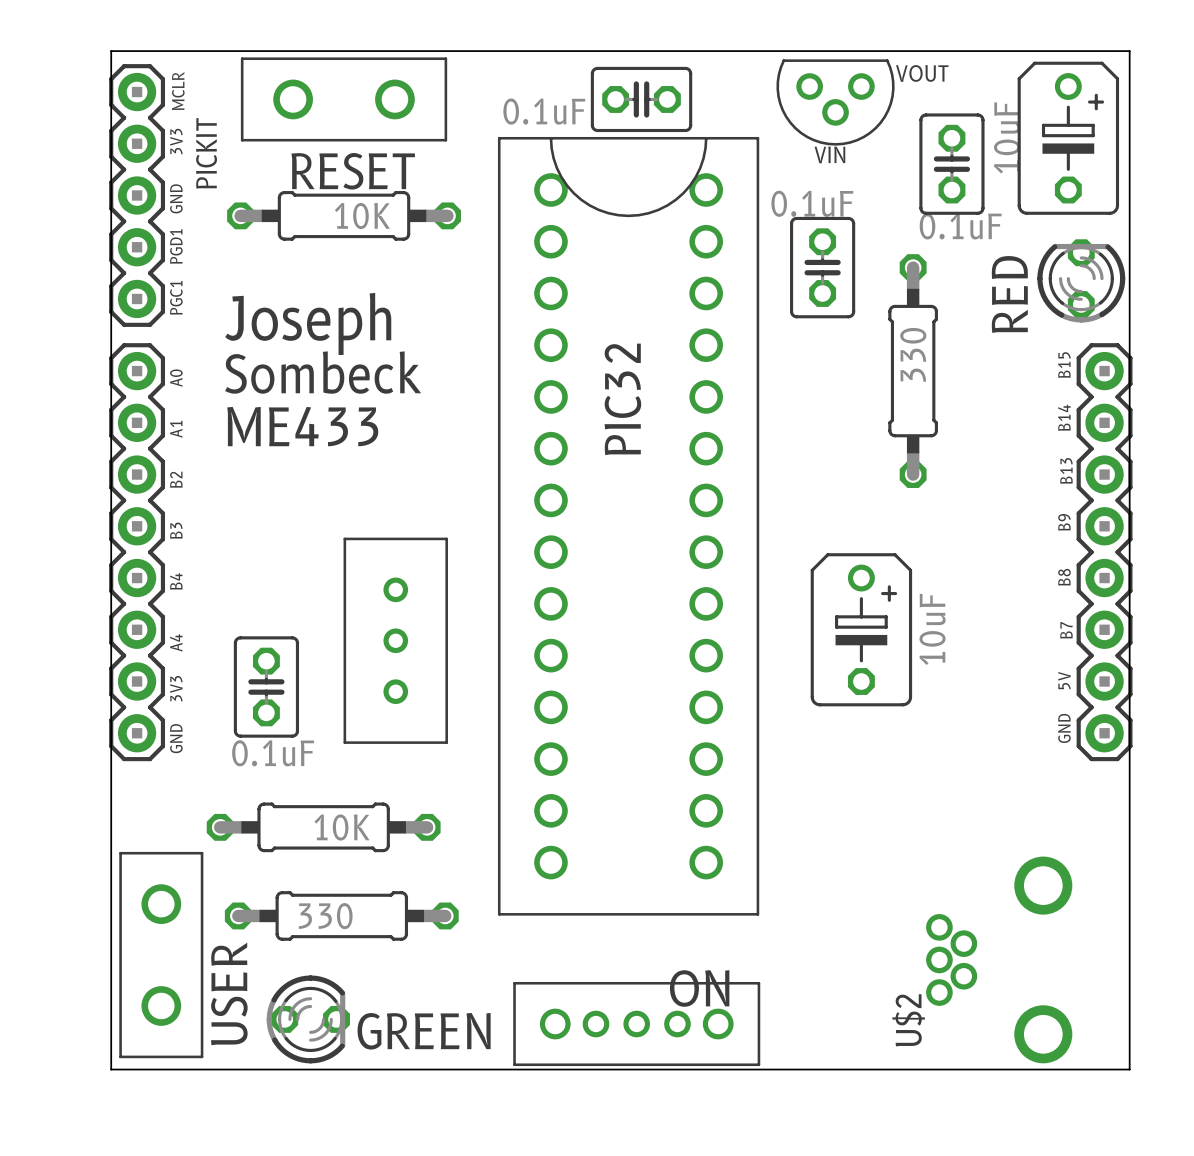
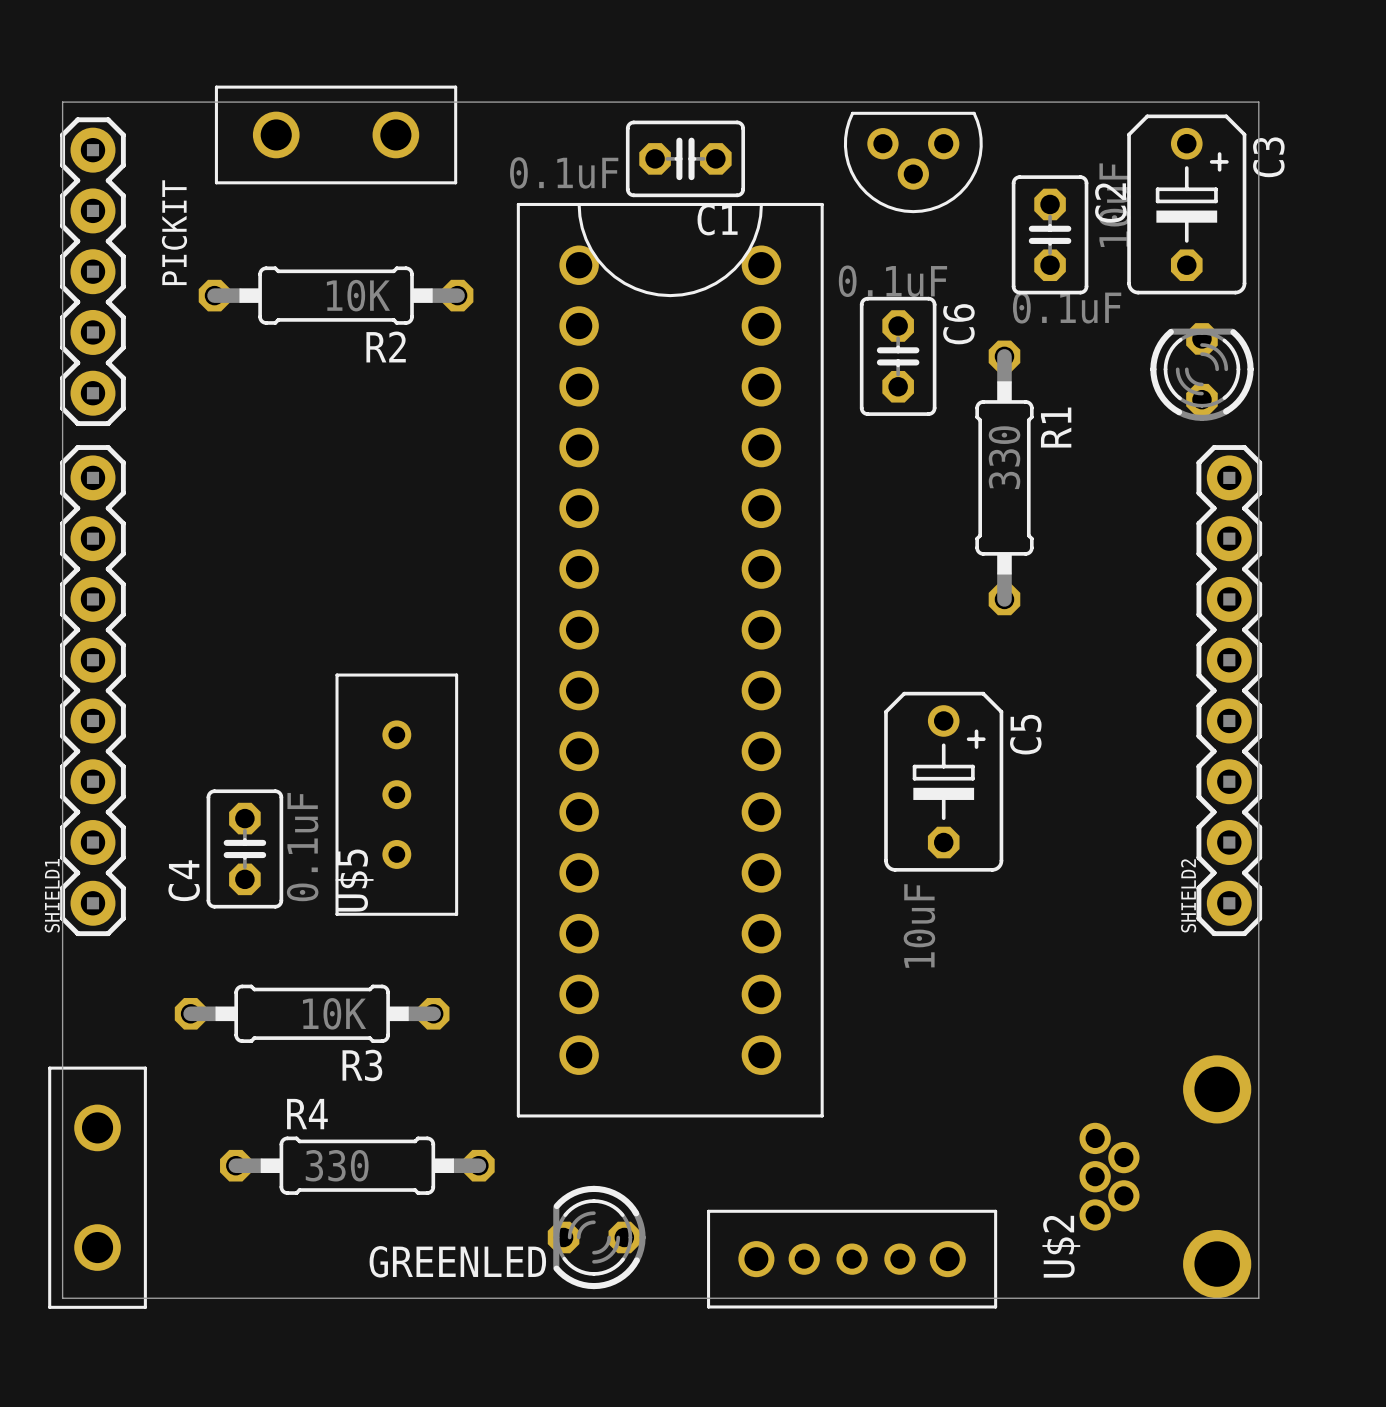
text: VOUT (922, 73) -> none
text: MCLR (178, 91) -> none
part position: (344, 99) -> (336, 134)
C3 name: none -> C3 (1268, 157)
C2 name: none -> C2 (1110, 203)
text: 3V3 (176, 141) -> none
C1 name: none -> C1 (717, 219)
text: VIN (829, 154) -> none
text: RESET (353, 171) -> none
text: GND (176, 198) -> none
C6 name: none -> C6 (958, 324)
text: PGD1 (176, 246) -> none
R2 name: none -> R2 (386, 346)
text: RED (1009, 294) -> none
text: PGC1 (176, 297) -> none
text: Joseph (308, 323) -> none
R1 name: none -> R1 (1056, 427)
text: B15 (1064, 365) -> none
text: Sombeck (323, 372) -> none
text: A0 (176, 378) -> none
text: PIC32 (622, 399) -> none
text: B14 (1064, 417) -> none
text: ME433 (302, 426) -> none
text: A1 (176, 429) -> none
text: B13 (1066, 470) -> none
text: B2 (176, 479) -> none
text: B9 (1064, 522) -> none
text: B3 (176, 530) -> none
text: B8 (1064, 577) -> none
text: B4 (176, 581) -> none
C5 name: none -> C5 (1025, 734)
C5 value position: 10uF (932, 629) -> 10uF (919, 926)
text: B7 (1066, 630) -> none
text: A4 (176, 642) -> none
text: 5V (1064, 680) -> none
text: 3V3 (176, 688) -> none
U$5 name: none -> U$5 (354, 880)
C4 name: none -> C4 (184, 880)
text: GND (1064, 728) -> none
SHIELD1 name: none -> SHIELD1 (52, 895)
SHIELD2 name: none -> SHIELD2 (1188, 895)
text: GND (176, 738) -> none
C4 value rotation: 0° (273, 753) -> 90° counterclockwise (302, 847)
R3 name: none -> R3 (362, 1065)
part: 330 (341, 915) -> none
part position: (161, 955) -> (97, 1187)
R4: none -> 330 (357, 1165)
U$2 position: (999, 959) -> (1165, 1176)
text: ON (699, 988) -> none
text: USER (229, 993) -> none
GREENLED: none -> (596, 1237)
part: (308, 1019) -> none
part position: (636, 1024) -> (852, 1259)
text: GREEN (424, 1031) -> none

